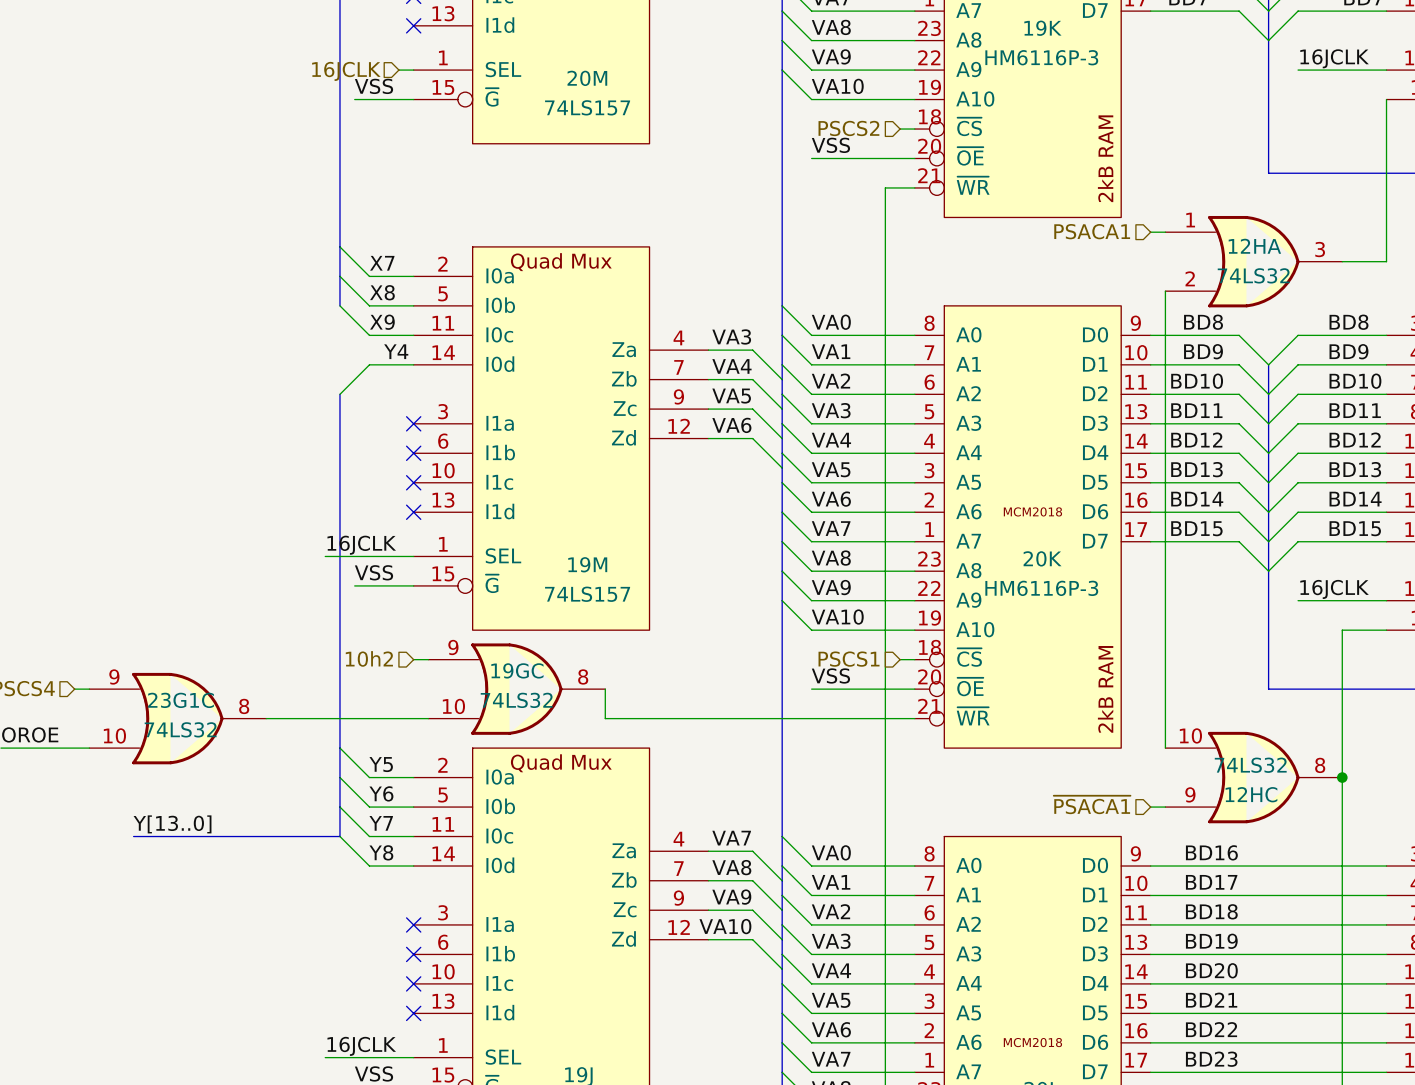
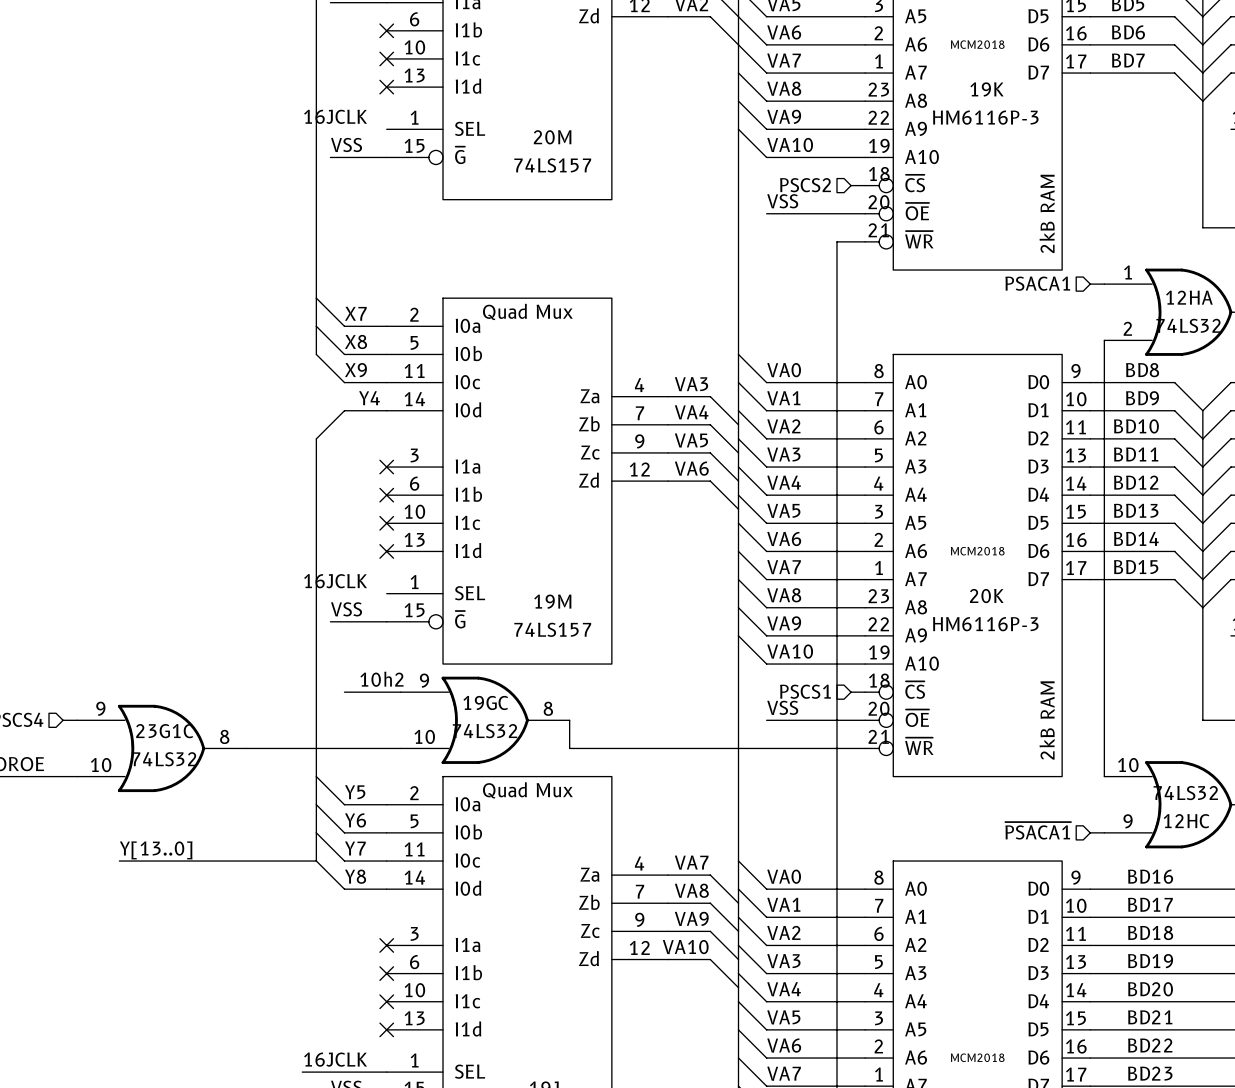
label: none -> 16JCLK (335, 116)
wire: (398, 70) (413, 70) -> none
hierarchical label: 16JCLK (346, 71) -> none
wire: (325, 556) (413, 556) -> none
label: none -> 10h2 (381, 679)
hierarchical label: 10h2 (369, 658) -> none
wire: none -> (344, 692) (386, 692)

